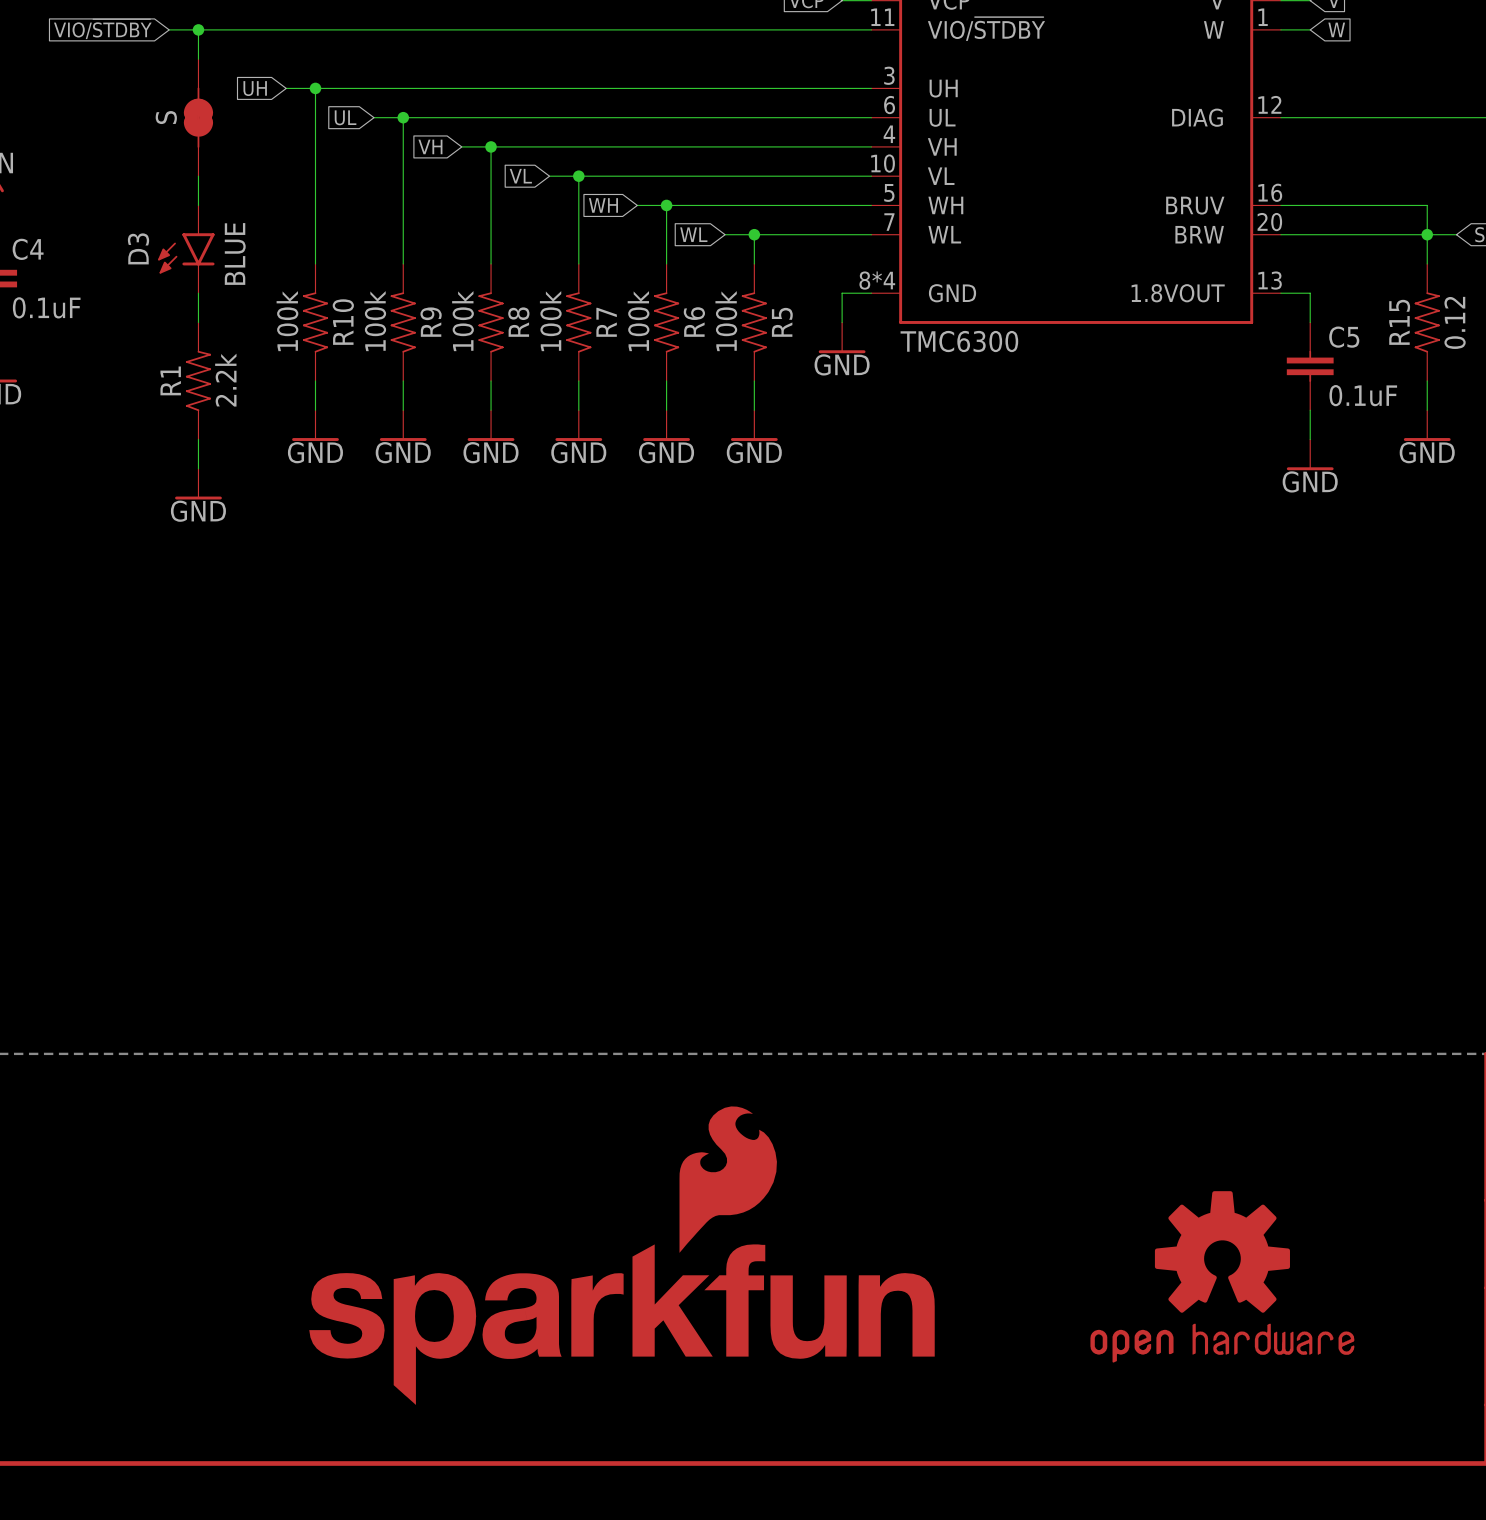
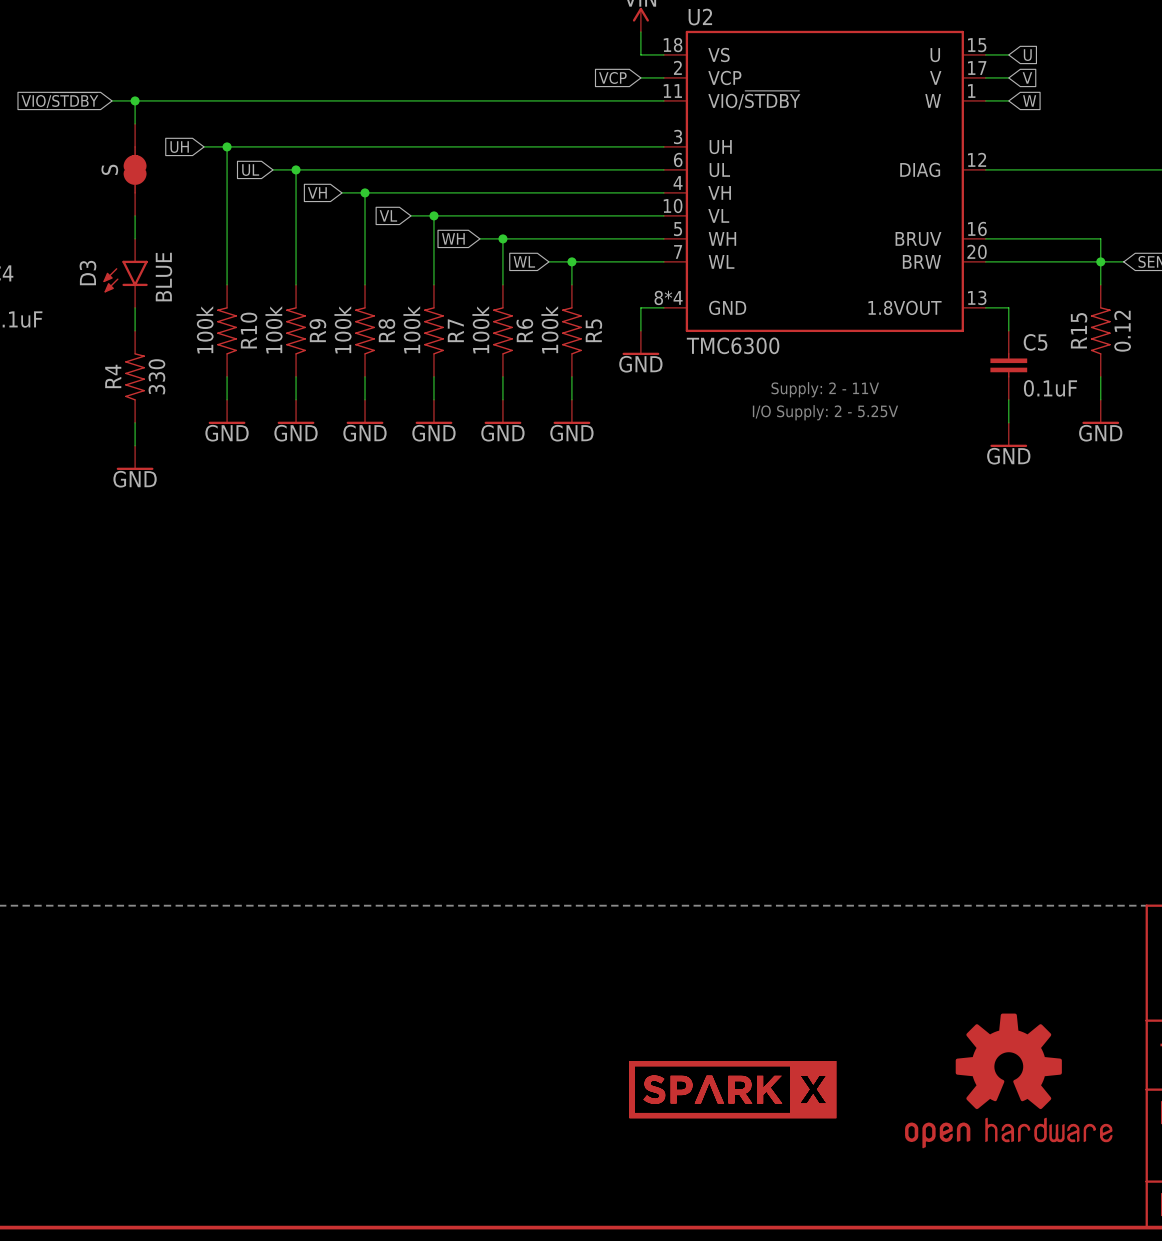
R1 name: R1 (170, 380) -> R4 (113, 376)
R1 value: 2.2k (225, 380) -> 330 (156, 376)
text: none -> Supply: 2 - 11V (825, 389)
text: none -> I/O Supply: 2 - 5.25V (825, 412)
part: (728, 1179) -> none
part position: (1222, 1276) -> (1008, 1080)
part: none -> (732, 1089)
part: (622, 1324) -> none

